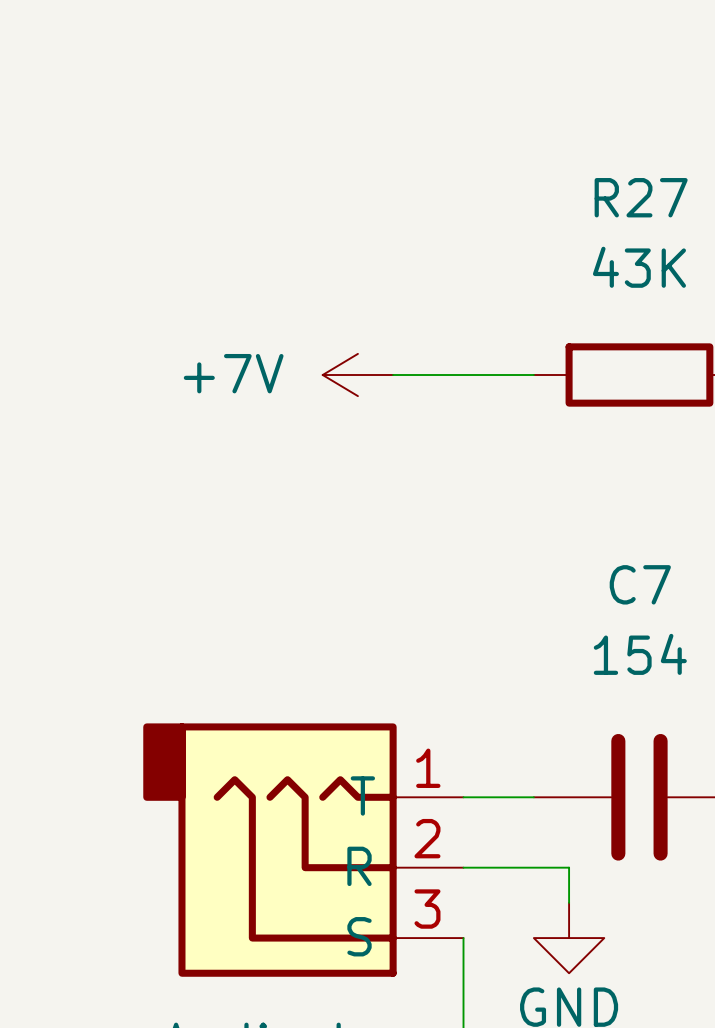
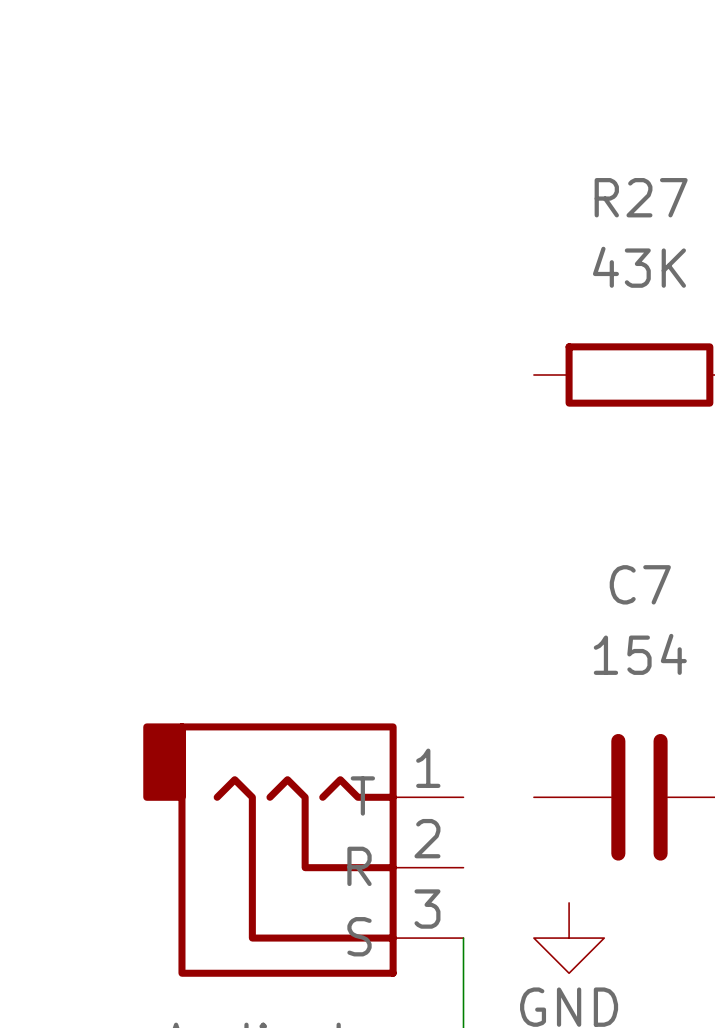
power symbol: +7V (357, 375) -> none
wire: (393, 375) (533, 375) -> none
wire: (463, 797) (533, 797) -> none
wire: (463, 867) (569, 867) (569, 902) -> none

